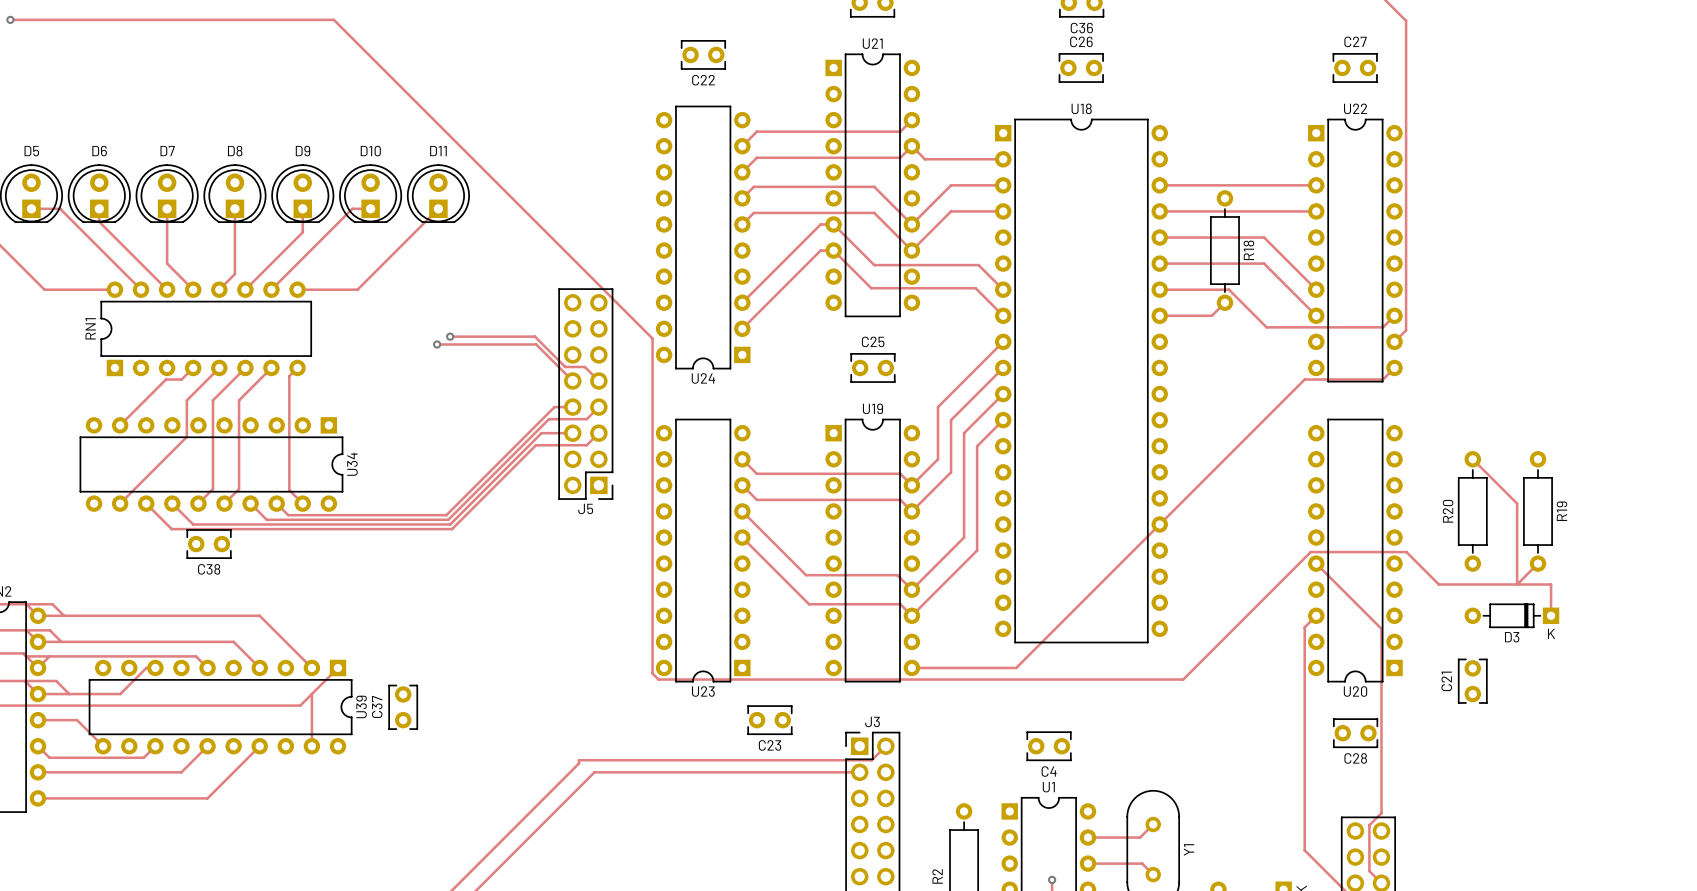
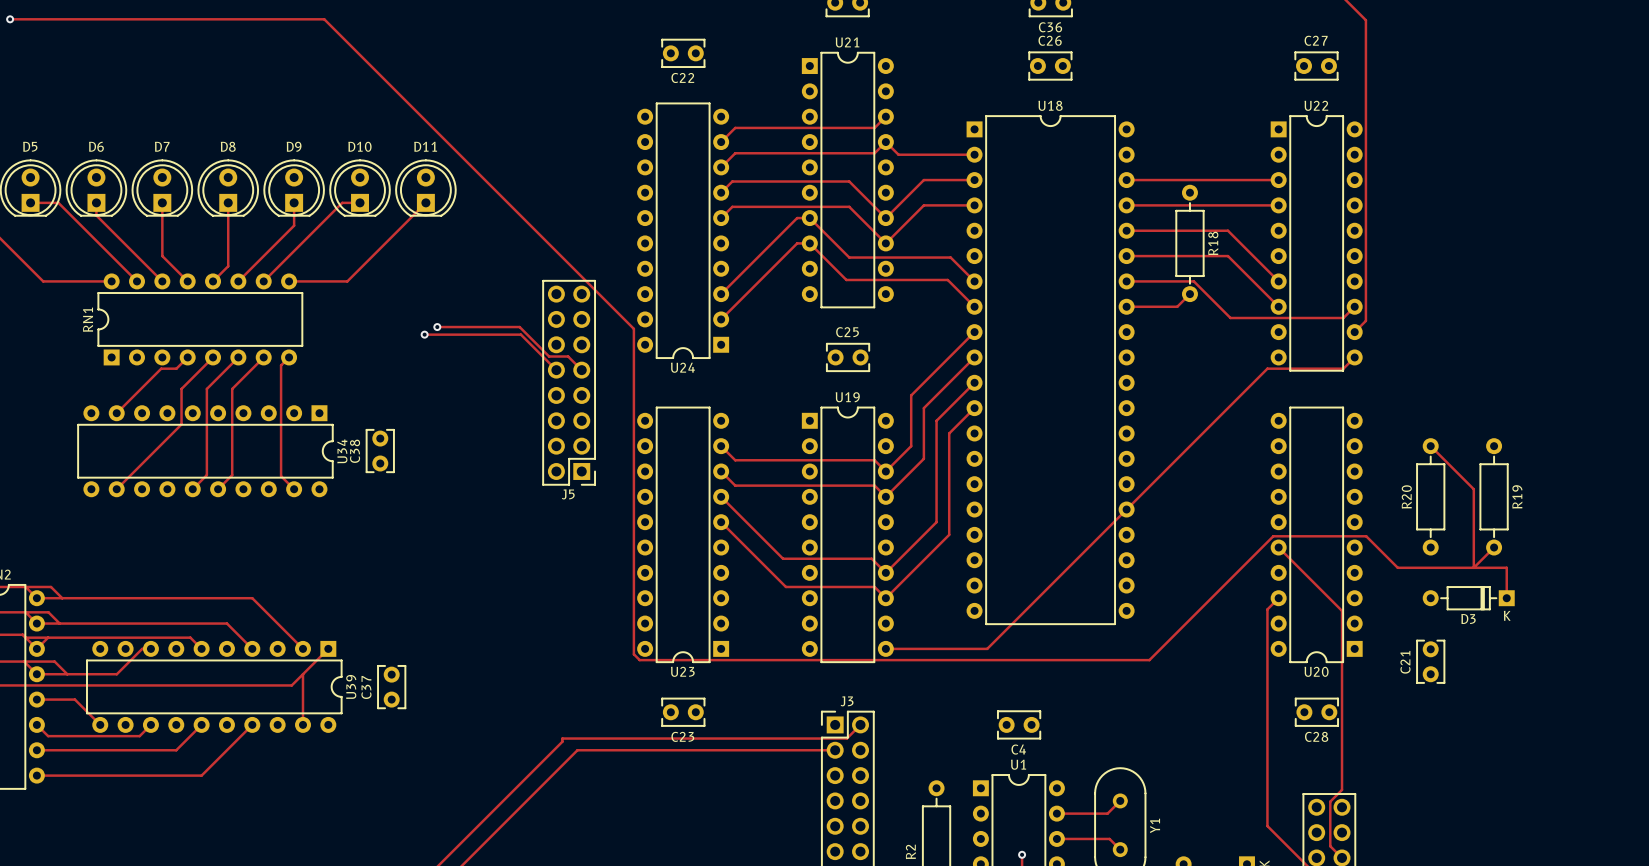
track: (572, 407) (554, 407) (446, 515) (288, 515) (276, 503) -> none
track: (598, 407) (586, 419) (548, 419) (448, 519) (266, 519) (250, 503) -> none
track: (572, 433) (541, 433) (450, 524) (193, 524) (172, 503) -> none
track: (598, 433) (586, 445) (535, 445) (452, 529) (171, 529) (146, 503) -> none
C38 rotation: 0° (209, 544) -> 90° clockwise (380, 451)
C38 position: (209, 544) -> (380, 451)
C23 position: (769, 720) -> (683, 712)

